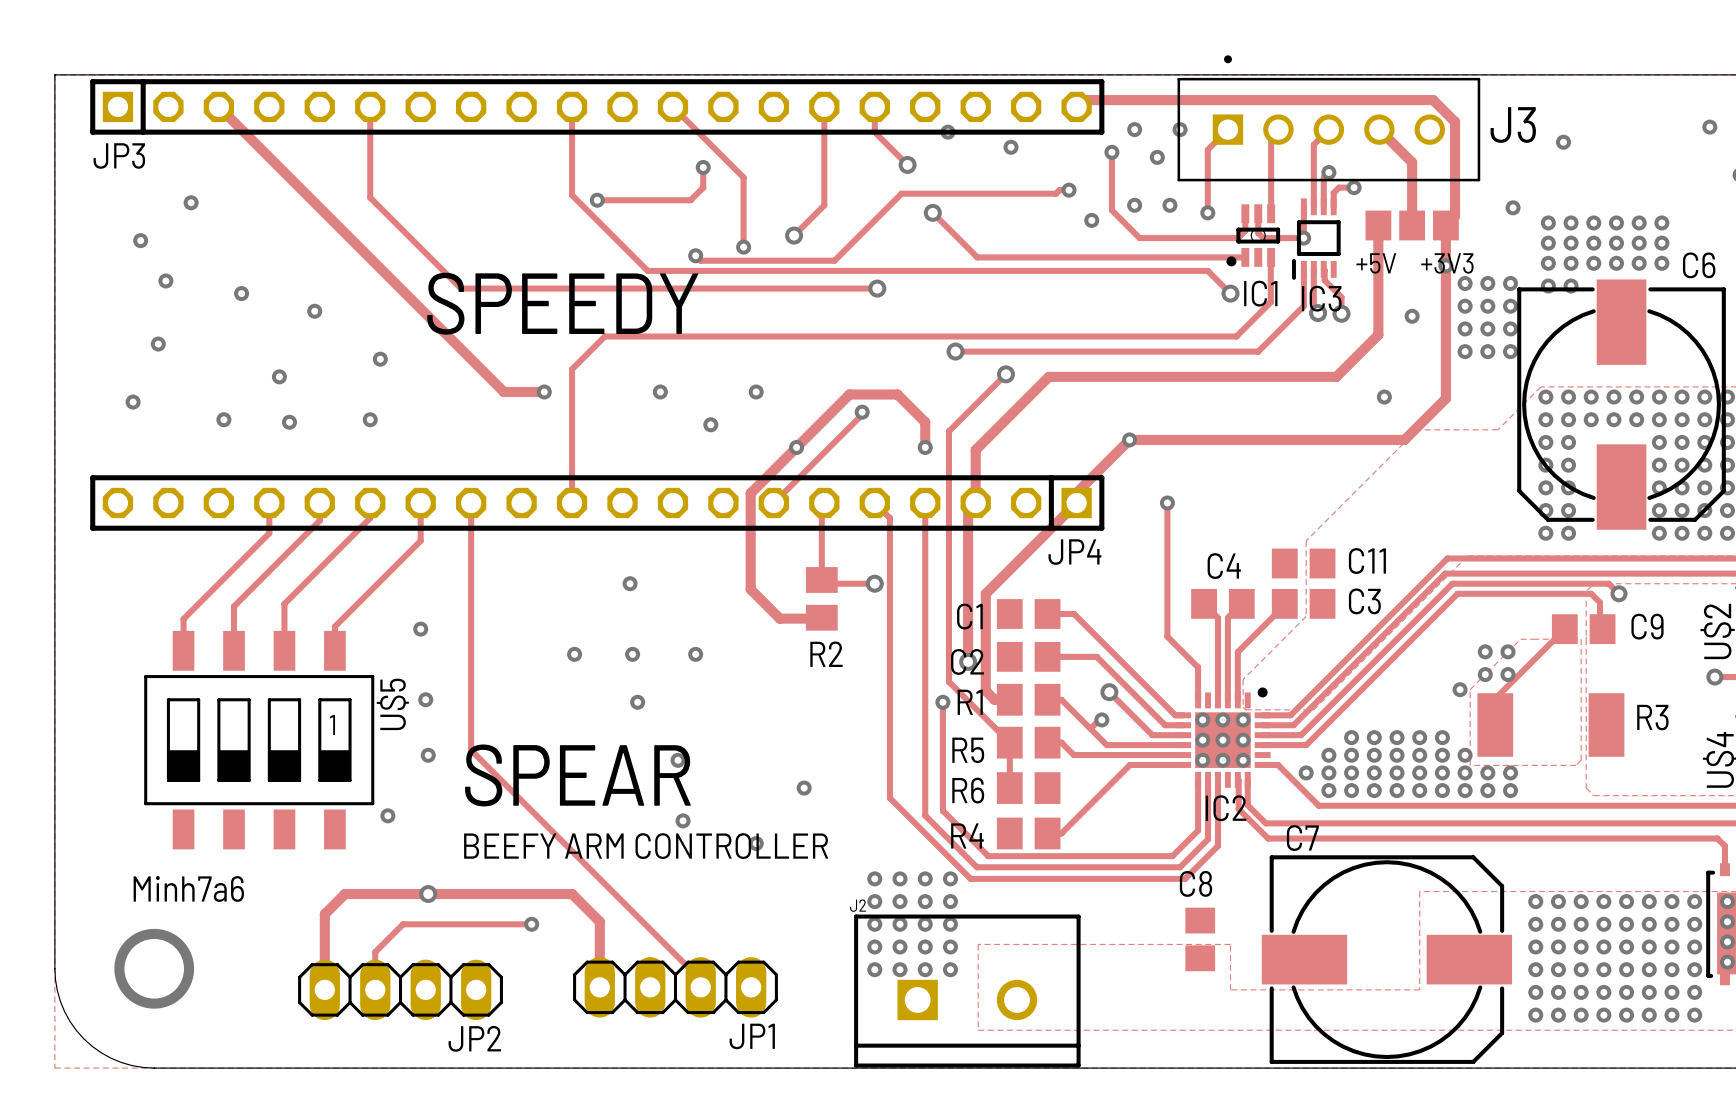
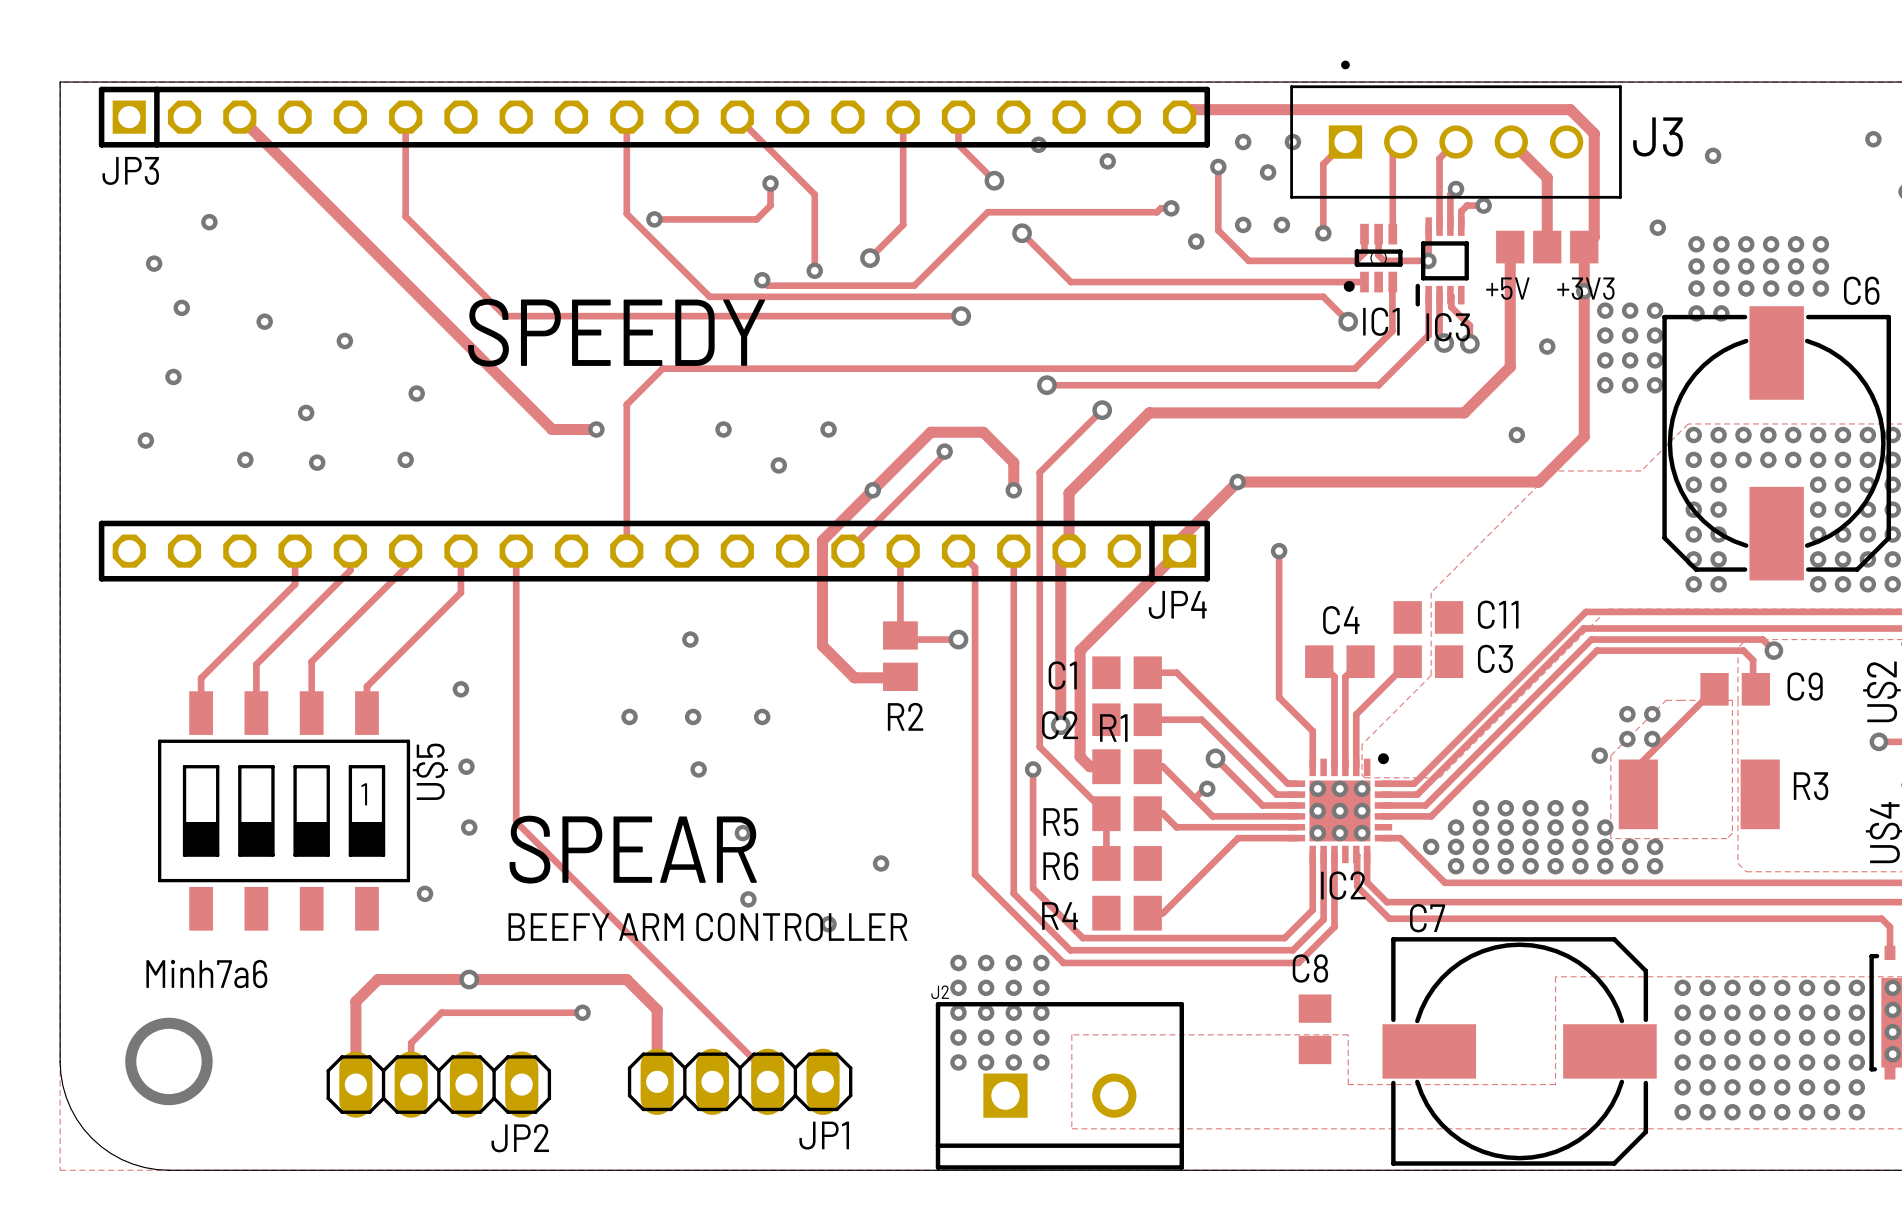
R1 name position: R1 (970, 702) -> R1 (1113, 728)

